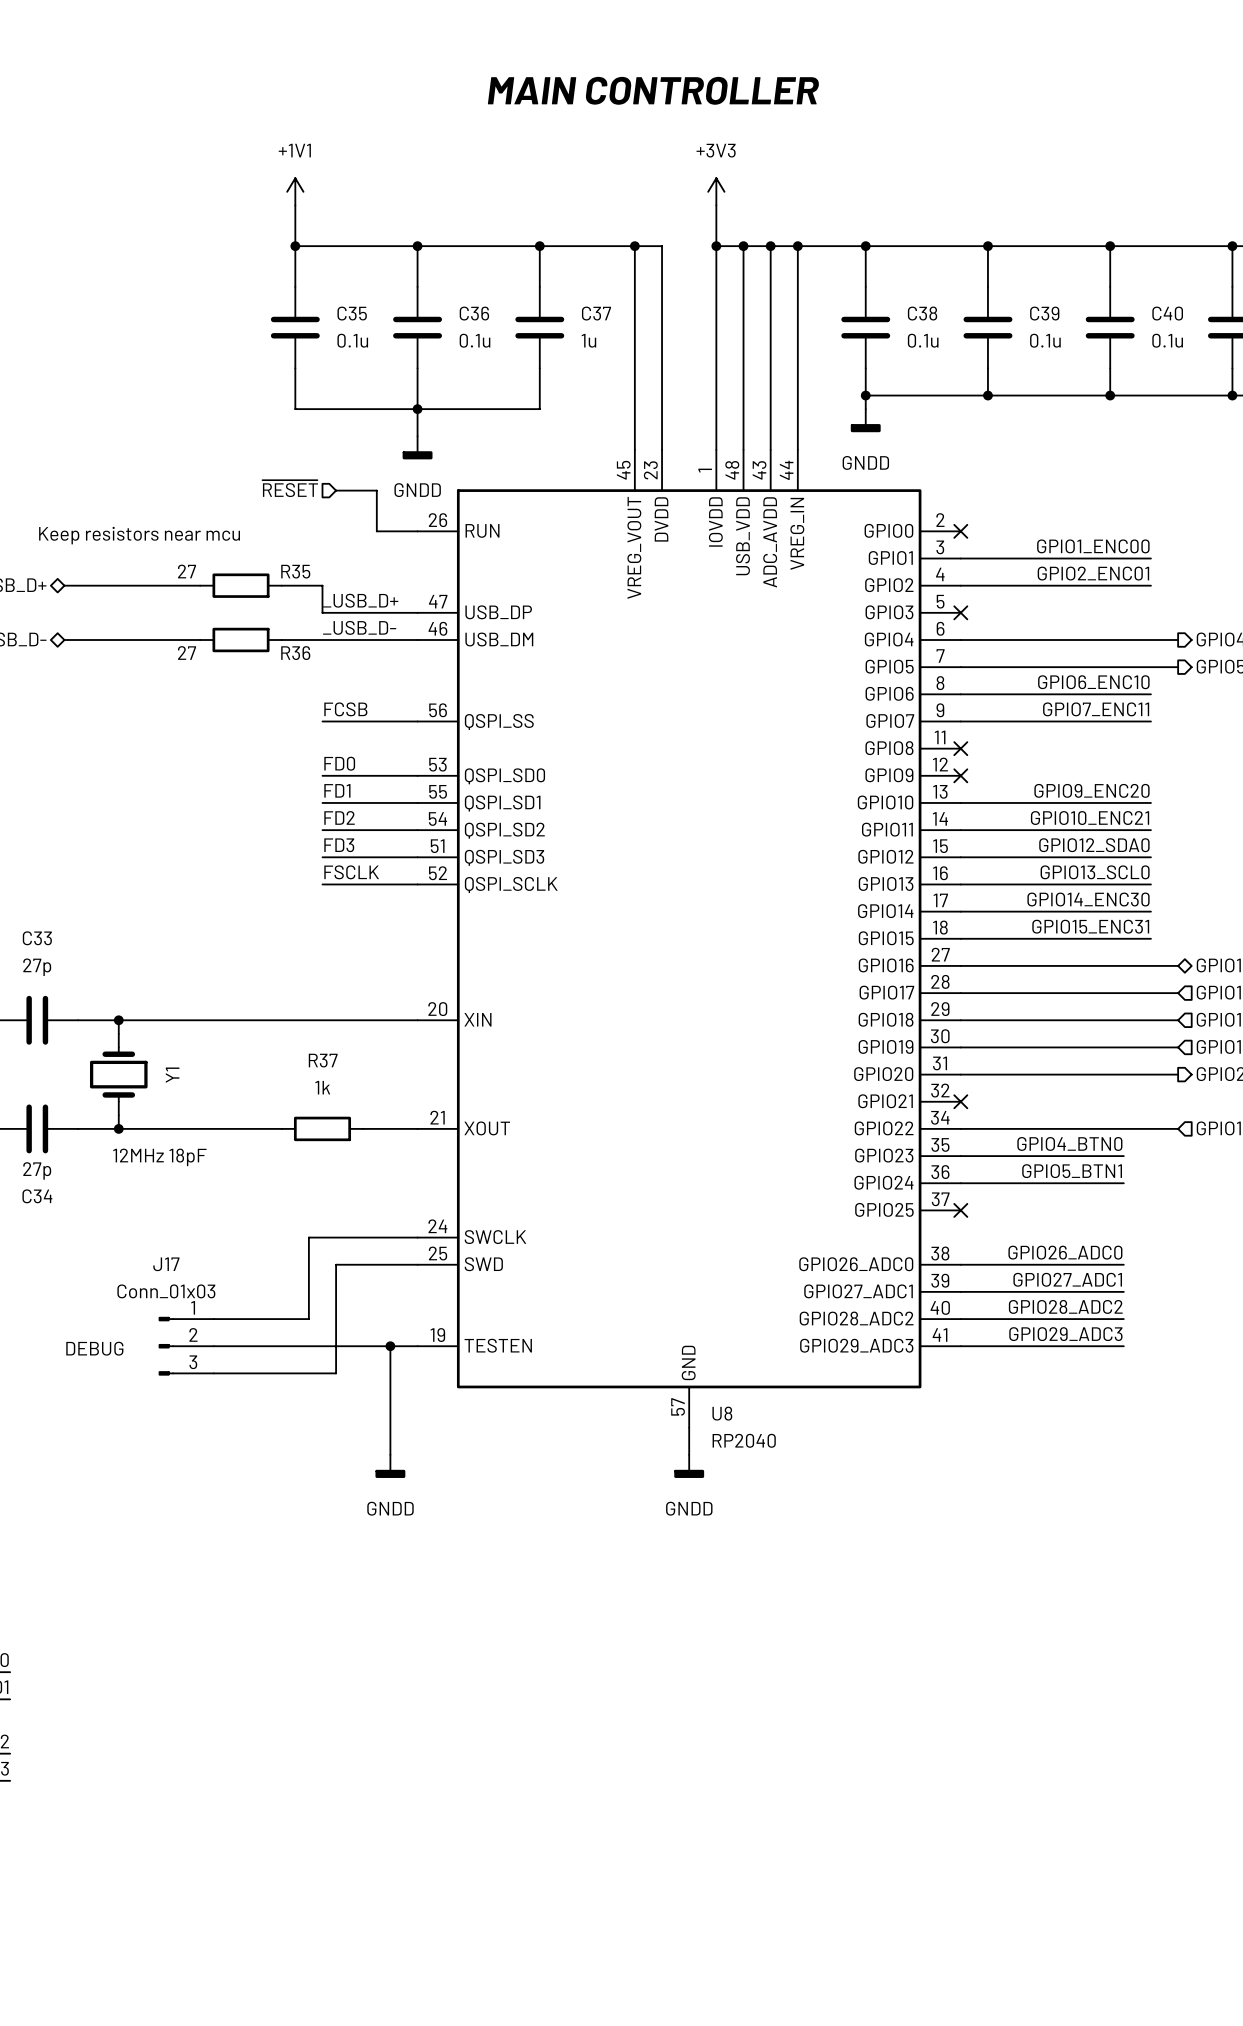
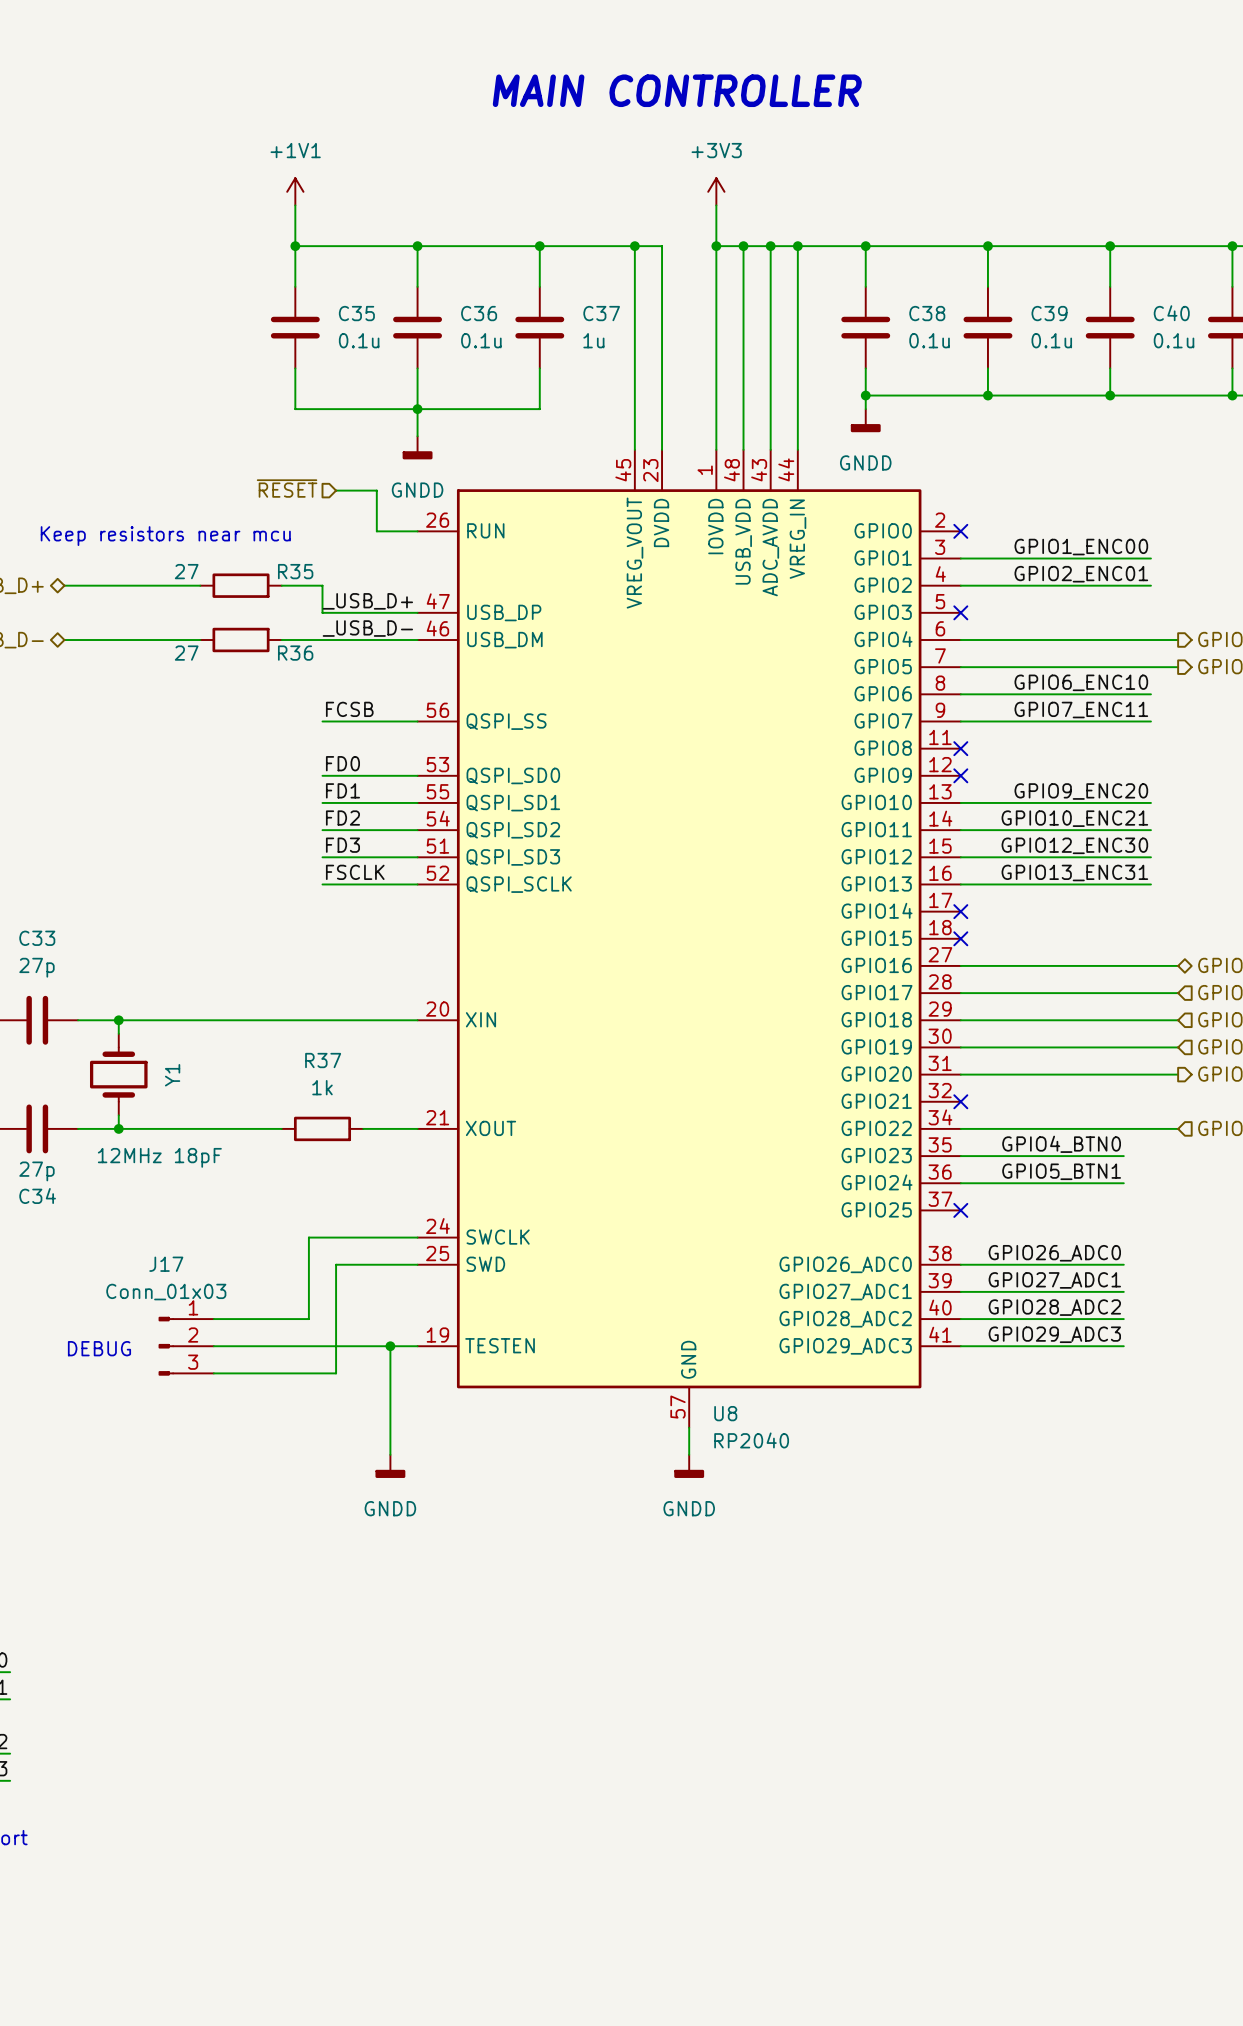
label: GPIO12_SDA0 (1094, 845) -> GPIO12_ENC30 (1074, 845)
label: GPIO13_SCL0 (1095, 872) -> GPIO13_ENC31 (1074, 872)
label: GPIO14_ENC30 (1088, 899) -> none
wire: (960, 911) (1150, 911) -> none
no-connect mark: none -> (960, 911)
label: GPIO15_ENC31 (1090, 926) -> none
wire: (960, 938) (1150, 938) -> none
no-connect mark: none -> (960, 938)

